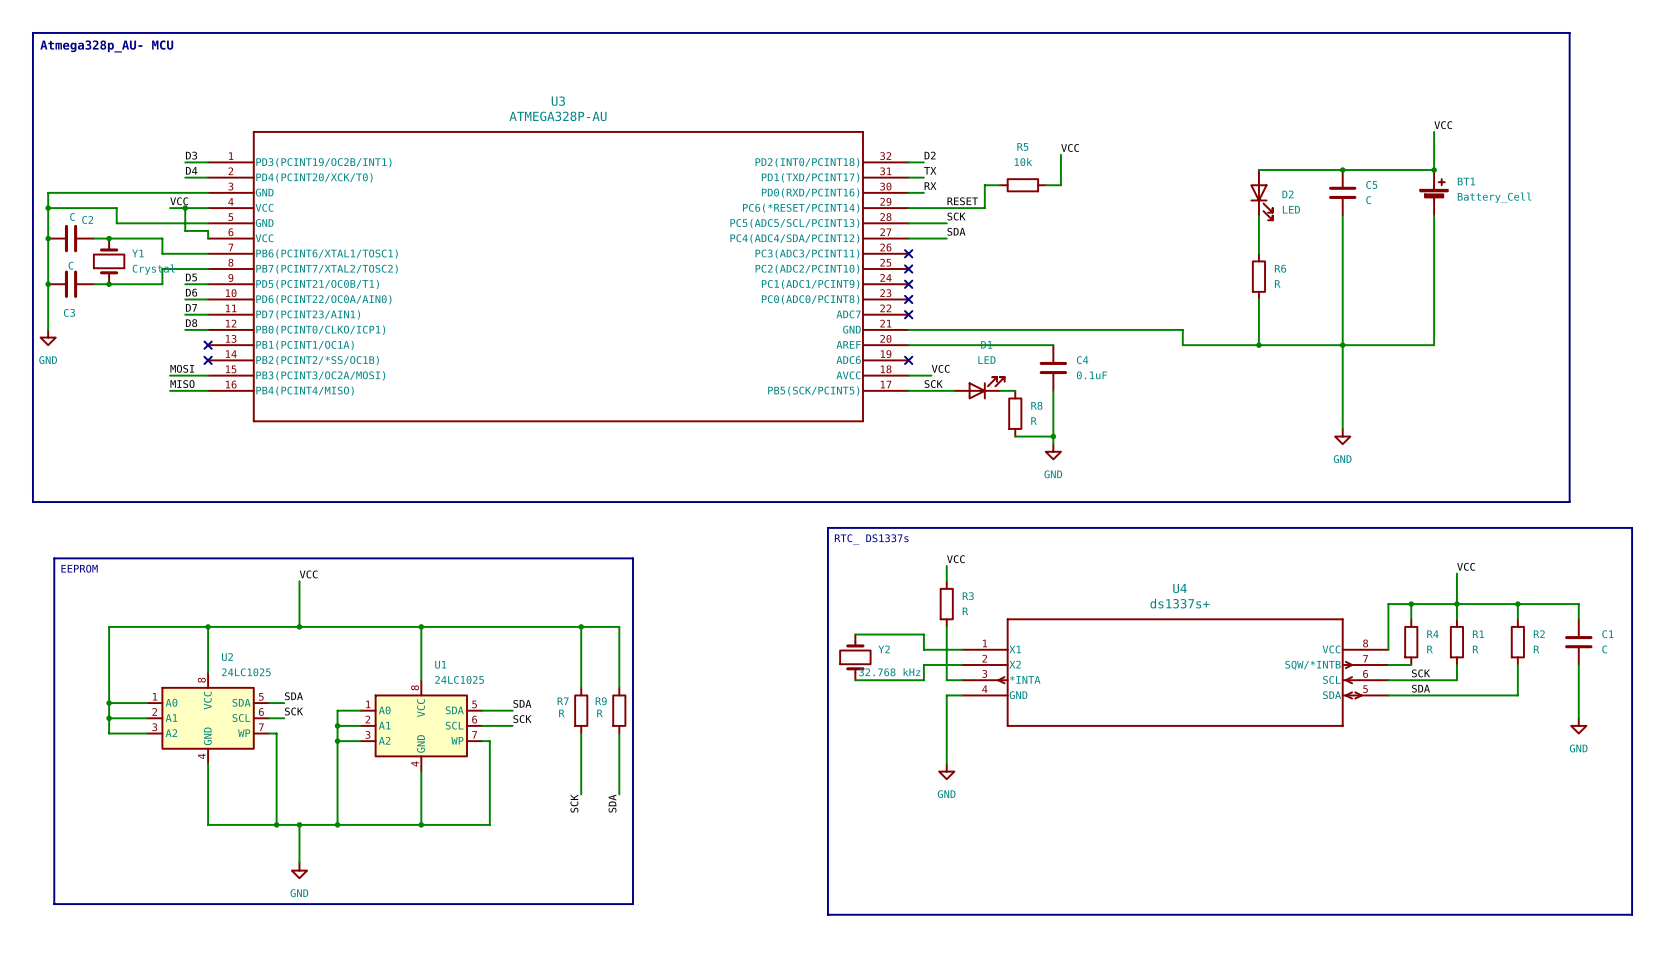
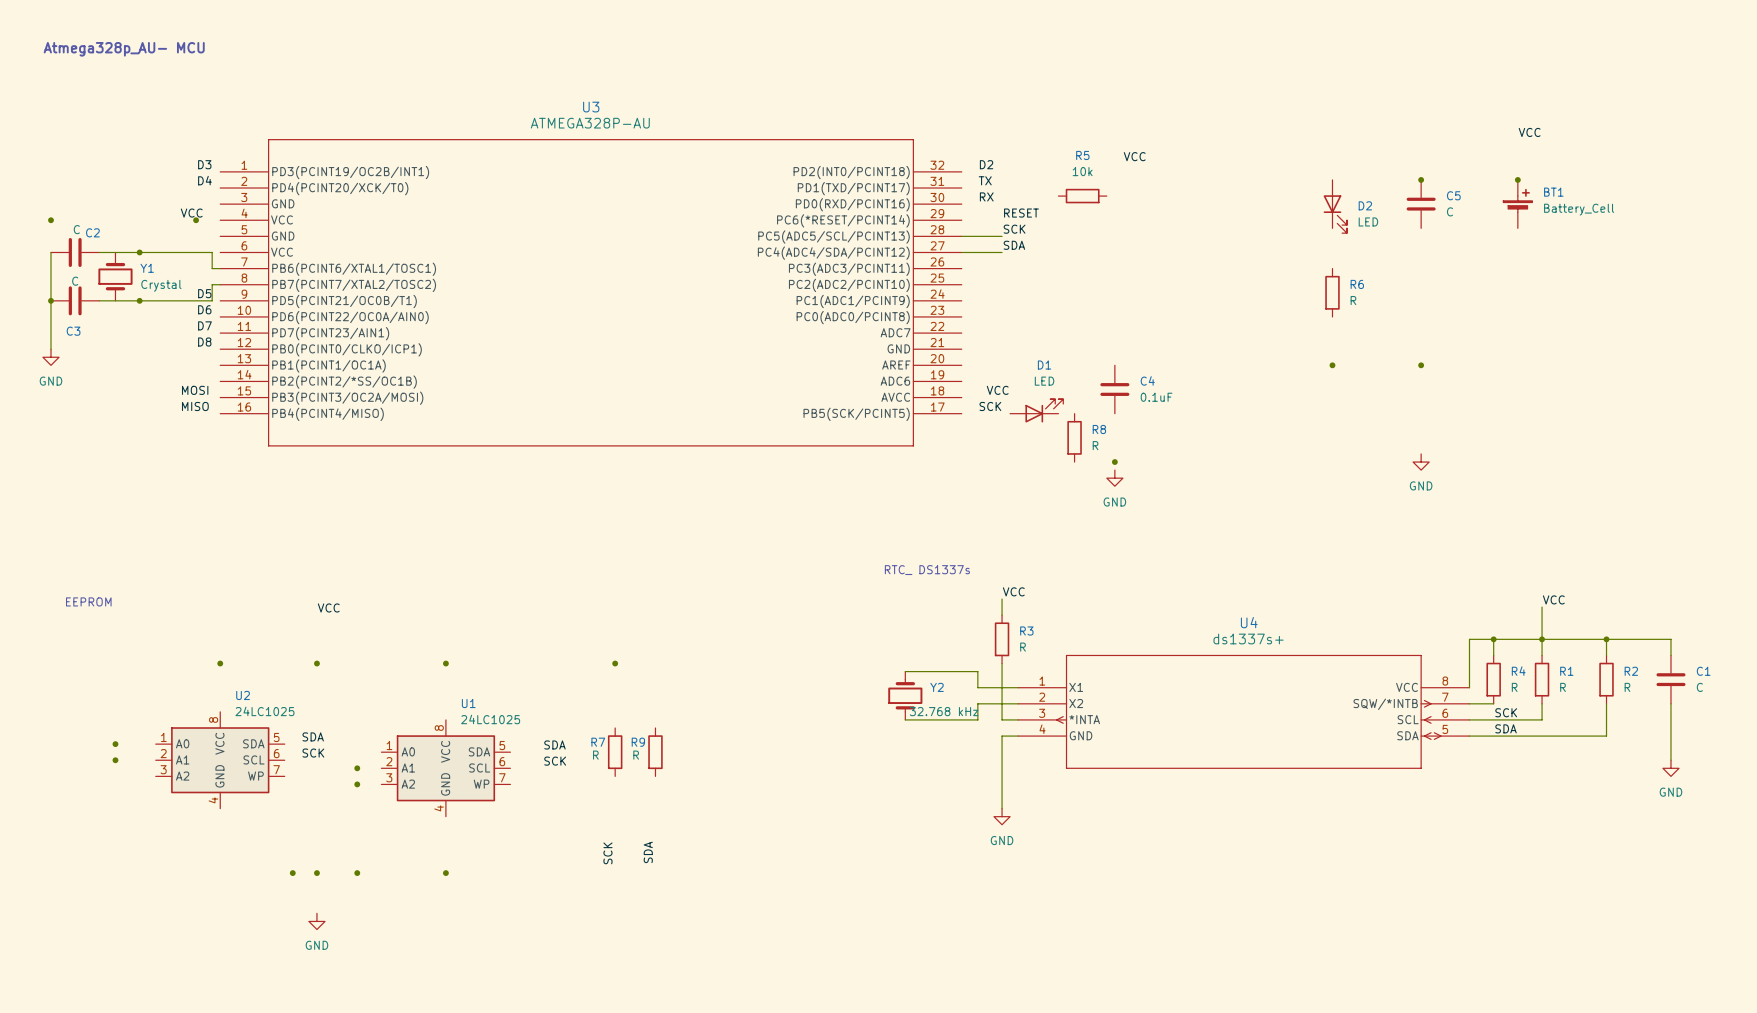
line: (32, 32) (1569, 32) (1569, 502) (32, 502) (32, 32) -> none
wire: (1434, 131) (1434, 170) (1258, 170) -> none
wire: (1060, 154) (1060, 185) (1045, 185) -> none
wire: (185, 162) (208, 162) -> none
wire: (908, 162) (923, 162) -> none
wire: (185, 177) (208, 177) -> none
wire: (908, 177) (923, 177) -> none
wire: (1000, 185) (984, 185) (984, 208) (908, 208) -> none
wire: (208, 192) (48, 192) (48, 238) -> none
wire: (908, 192) (923, 192) -> none
wire: (48, 208) (116, 208) (116, 223) (208, 223) -> none
wire: (170, 208) (208, 208) -> none
wire: (185, 208) (185, 230) (208, 230) (208, 238) -> none
wire: (1258, 215) (1258, 253) -> none
wire: (1342, 215) (1342, 428) -> none
wire: (1434, 215) (1434, 345) (1182, 345) (1182, 329) (908, 329) -> none
junction: (48, 238) -> none
junction position: (109, 238) -> (139, 252)
wire: (162, 238) (162, 253) (200, 253) -> (171, 252) (212, 252) (212, 268)
no-connect mark: (908, 253) -> none
wire: (200, 269) (162, 269) (162, 284) -> (196, 300) (171, 300)
no-connect mark: (908, 269) -> none
junction position: (109, 284) -> (139, 300)
wire: (200, 284) (208, 284) -> (212, 300) (212, 284)
no-connect mark: (908, 284) -> none
wire: (185, 299) (208, 299) -> none
no-connect mark: (908, 299) -> none
wire: (1258, 299) (1258, 345) -> none
wire: (185, 314) (208, 314) -> none
no-connect mark: (908, 314) -> none
wire: (185, 329) (208, 329) -> none
no-connect mark: (208, 345) -> none
wire: (908, 345) (1053, 345) -> none
no-connect mark: (208, 360) -> none
no-connect mark: (908, 360) -> none
wire: (170, 375) (208, 375) -> none
wire: (908, 375) (931, 375) -> none
wire: (170, 390) (208, 390) -> none
wire: (908, 390) (954, 390) -> none
wire: (1000, 390) (1015, 390) -> none
wire: (1053, 390) (1053, 444) -> none
wire: (1015, 436) (1053, 436) -> none
line: (827, 527) (1632, 527) (1632, 914) (827, 914) (827, 527) -> none
line: (54, 558) (633, 558) (633, 904) (54, 904) (54, 558) -> none
wire: (299, 581) (299, 626) -> none
wire: (208, 626) (208, 672) -> none
wire: (421, 626) (421, 680) -> none
wire: (581, 626) (581, 687) -> none
wire: (619, 687) (619, 626) (109, 626) (109, 733) (147, 733) -> none
wire: (109, 703) (147, 703) -> none
wire: (269, 703) (284, 703) -> none
wire: (360, 710) (337, 710) (337, 824) -> none
wire: (482, 710) (512, 710) -> none
wire: (109, 718) (147, 718) -> none
wire: (269, 718) (284, 718) -> none
wire: (337, 725) (360, 725) -> none
wire: (482, 725) (512, 725) -> none
wire: (269, 733) (276, 733) (276, 824) -> none
wire: (581, 733) (581, 794) -> none
wire: (619, 733) (619, 794) -> none
wire: (337, 741) (360, 741) -> none
wire: (482, 741) (489, 741) (489, 824) (208, 824) (208, 763) -> none
wire: (421, 771) (421, 824) -> none
wire: (299, 824) (299, 862) -> none

